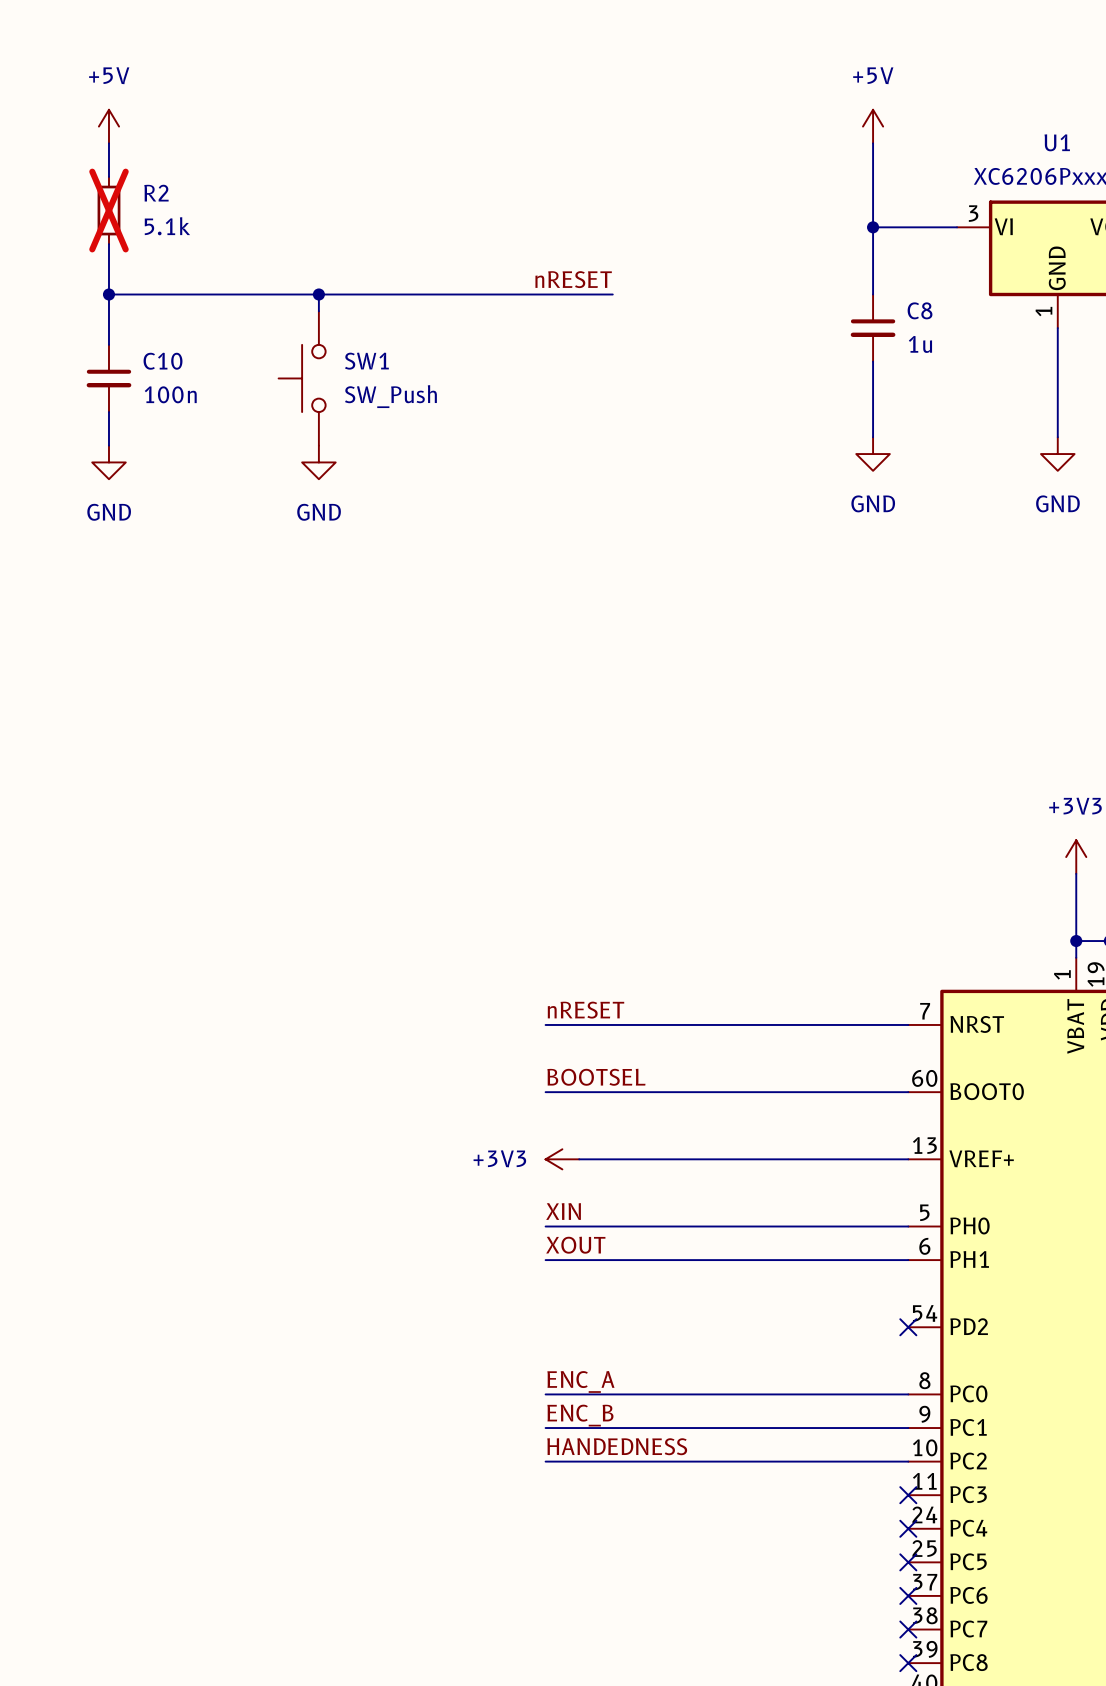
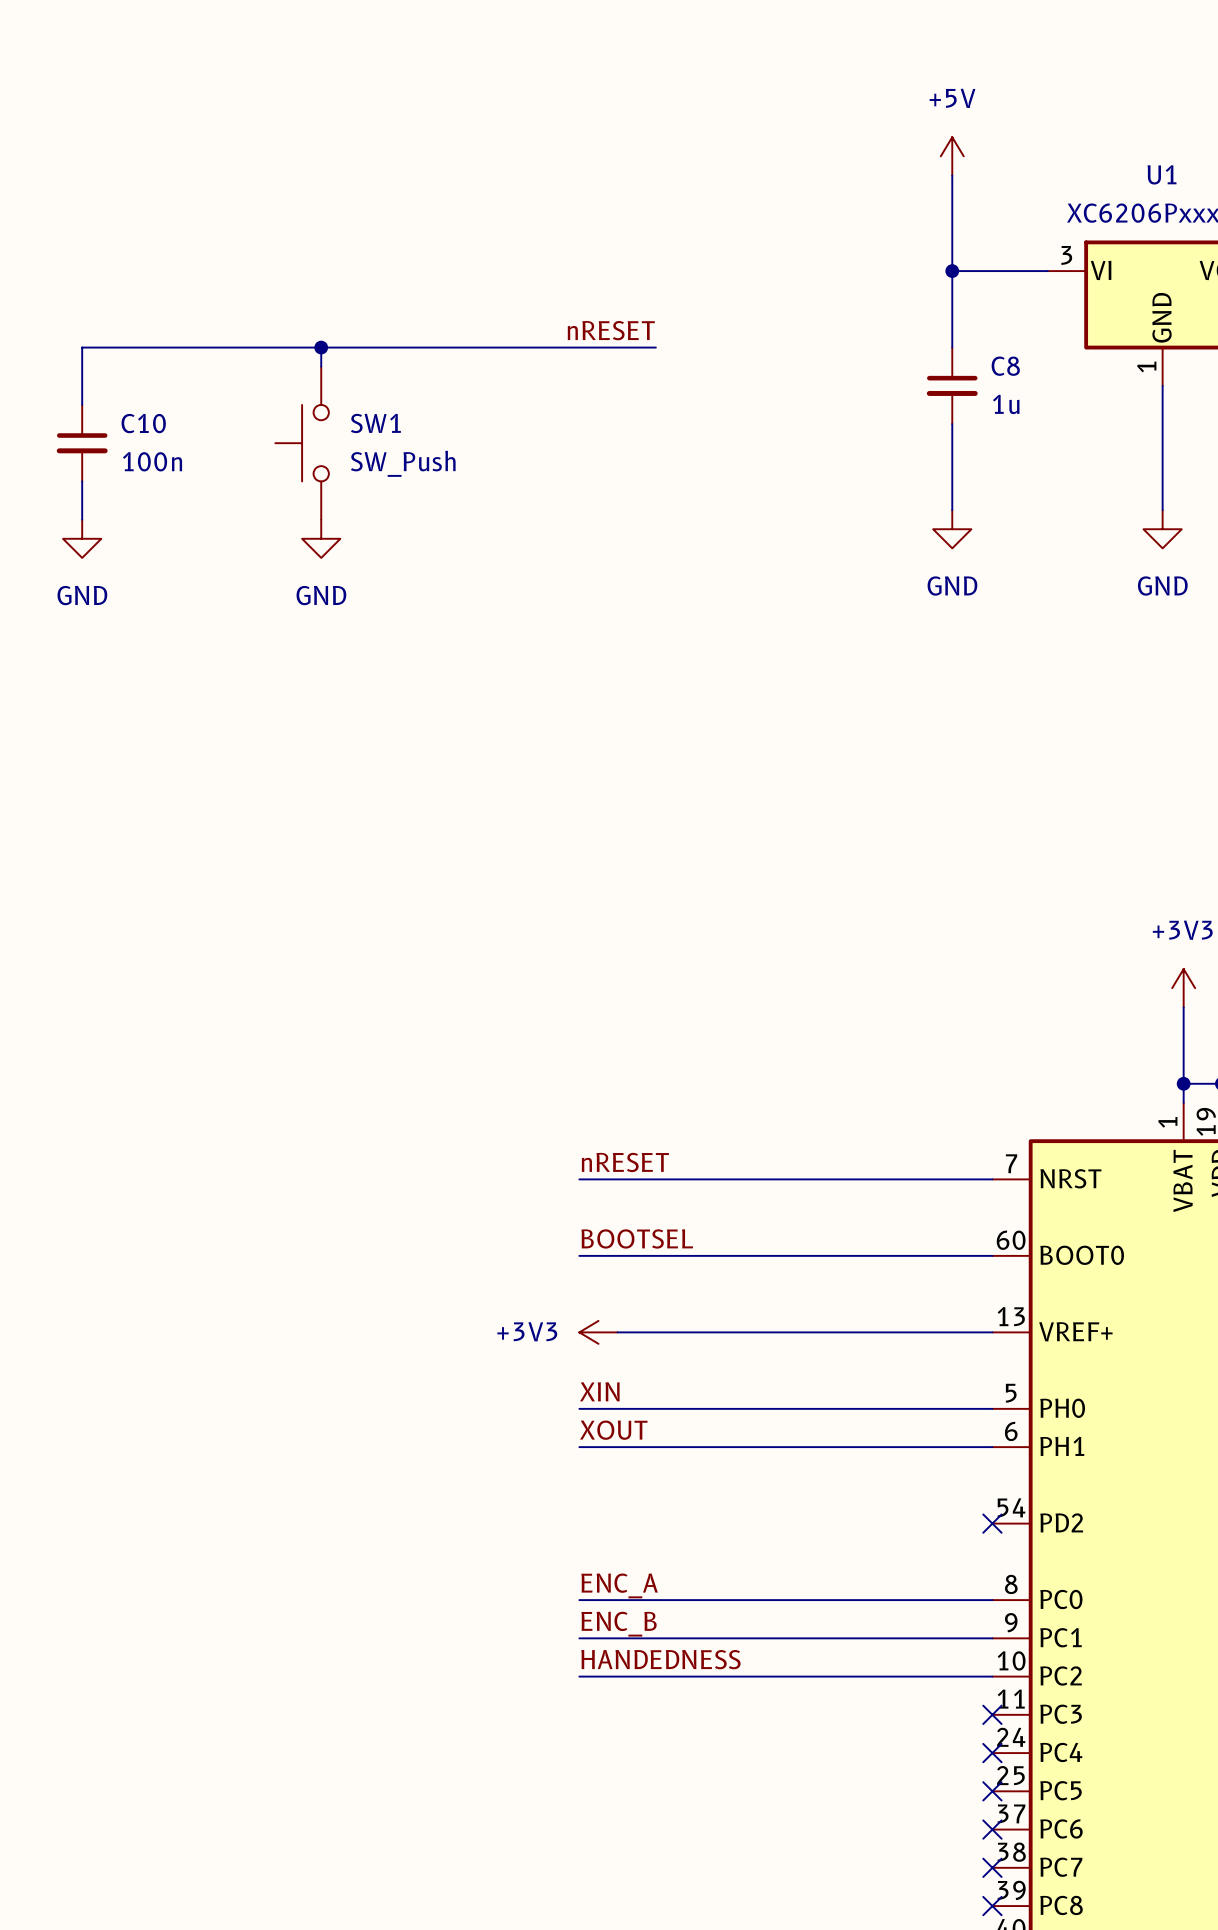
power symbol: +5V (108, 126) -> none
wire: (108, 143) (108, 176) -> none
R2: 5.1k (108, 210) -> none
wire: (108, 244) (108, 294) -> none
junction: (108, 294) -> none

